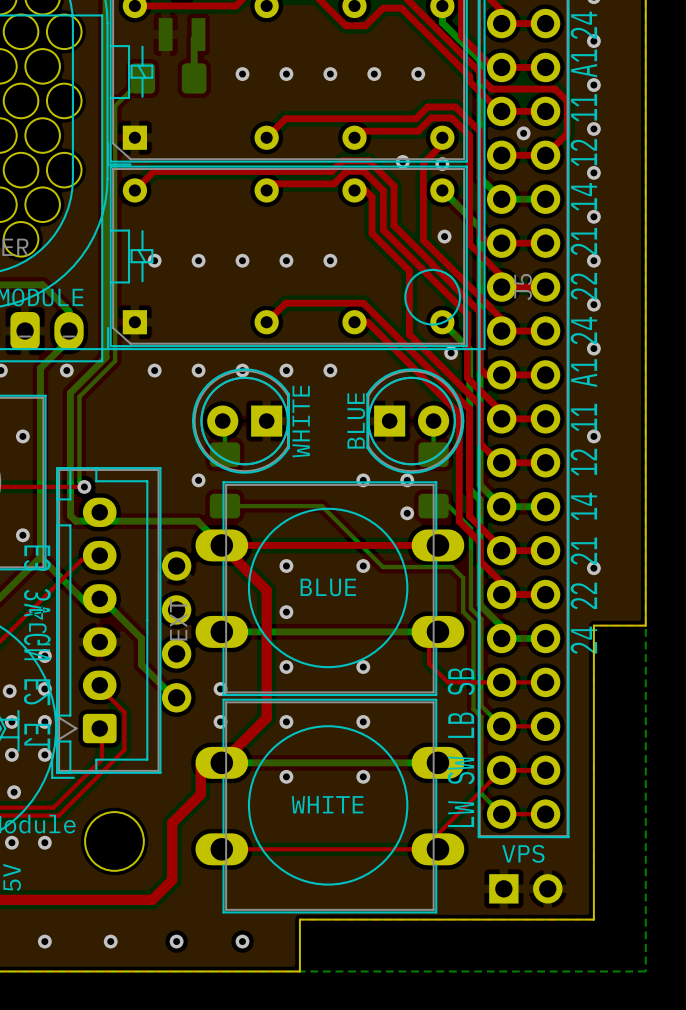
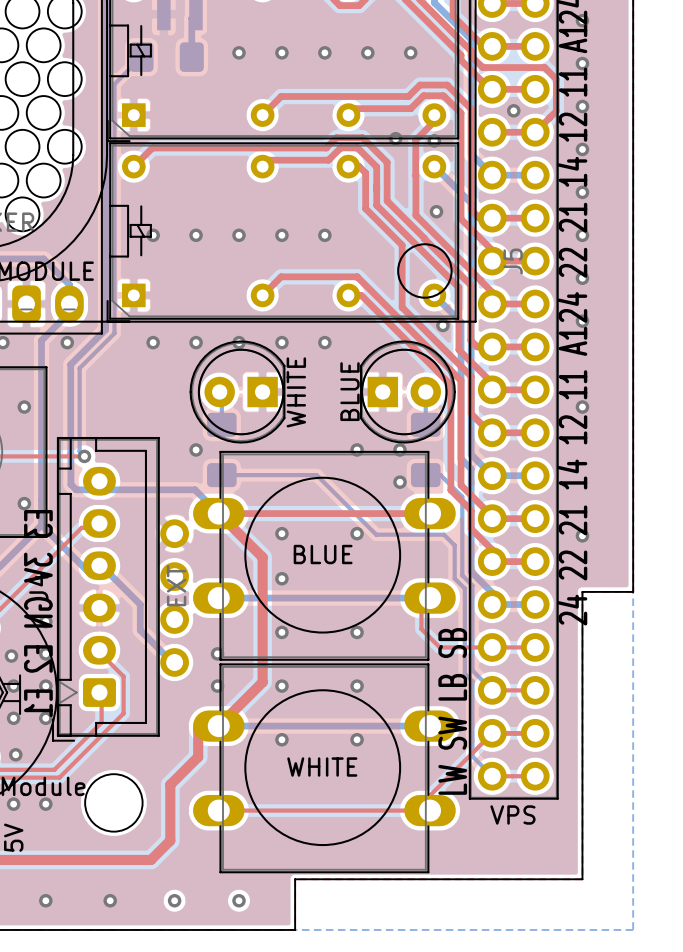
part: (525, 888) -> none

